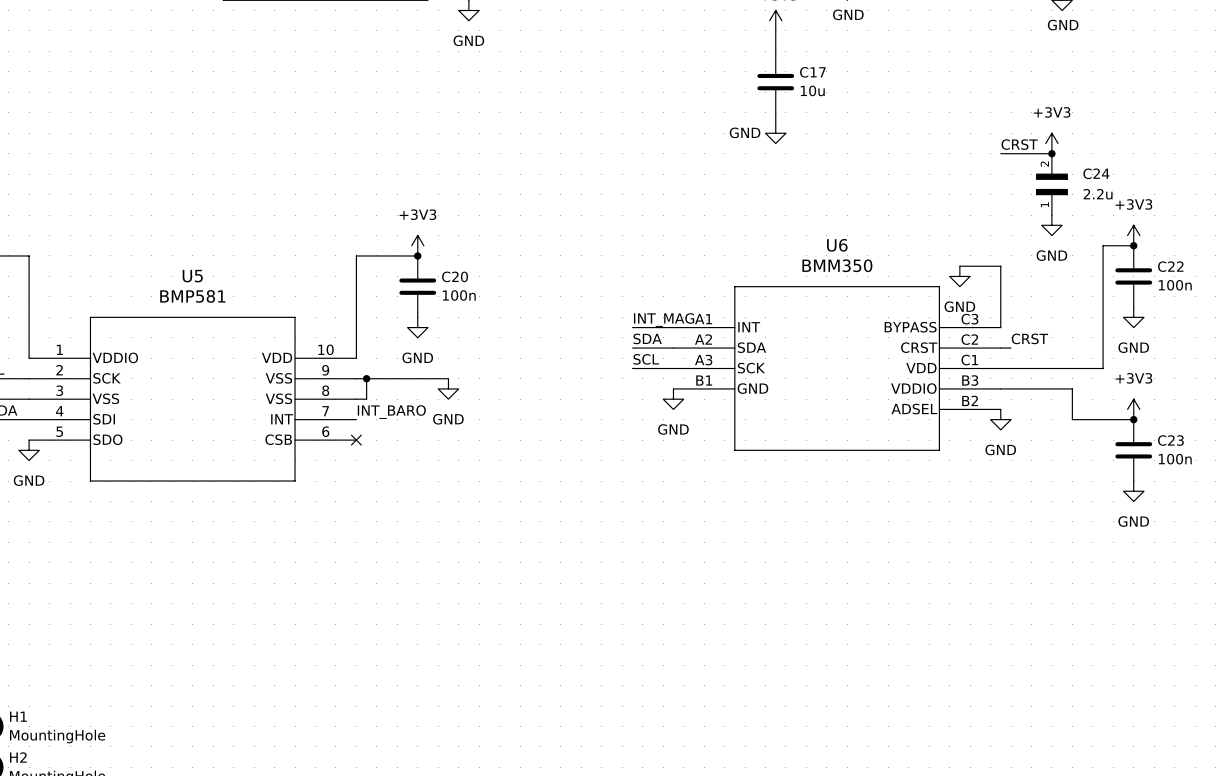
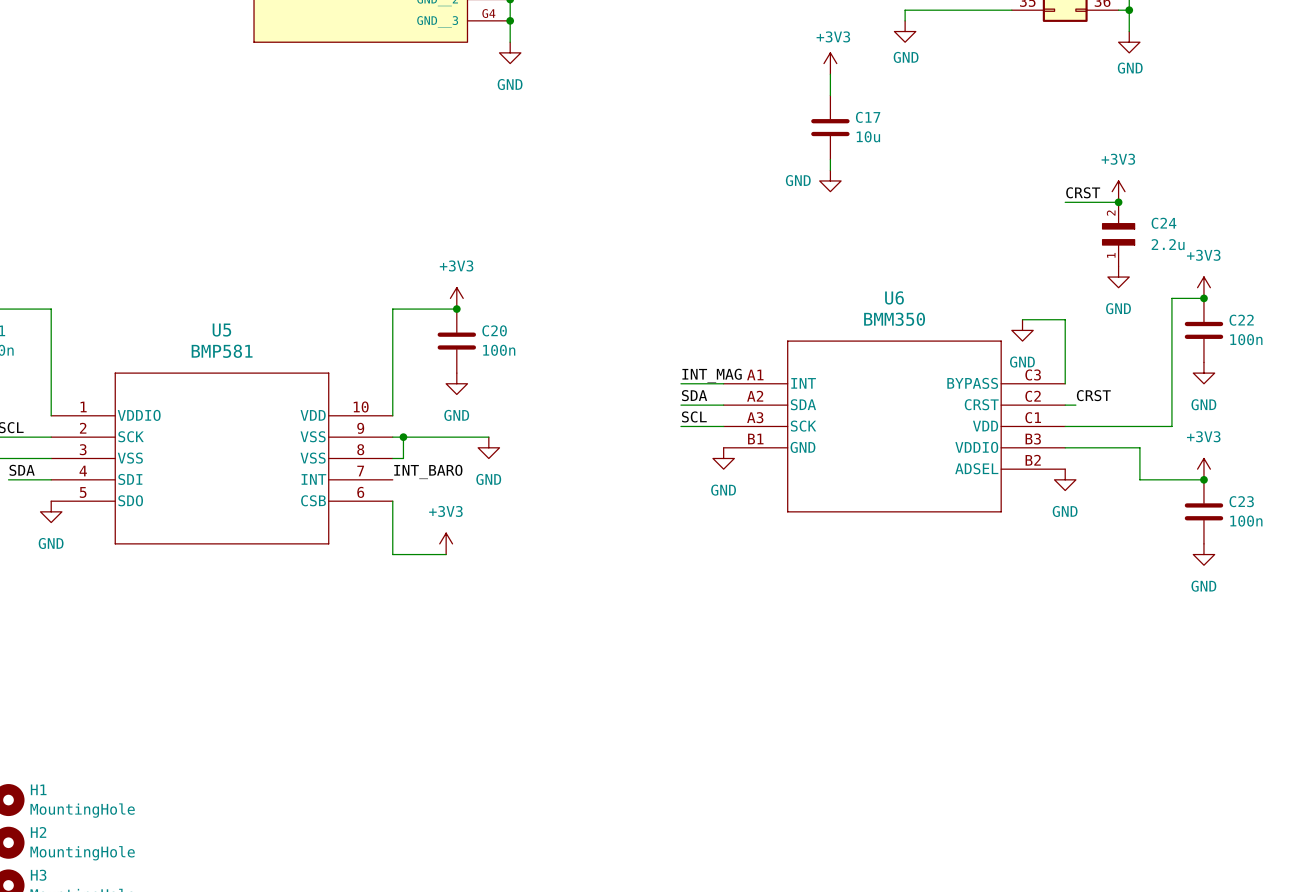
wire: none -> (392, 501) (392, 554) (446, 554)
no-connect mark: (356, 440) -> none
power symbol: none -> +3V3 (446, 543)

